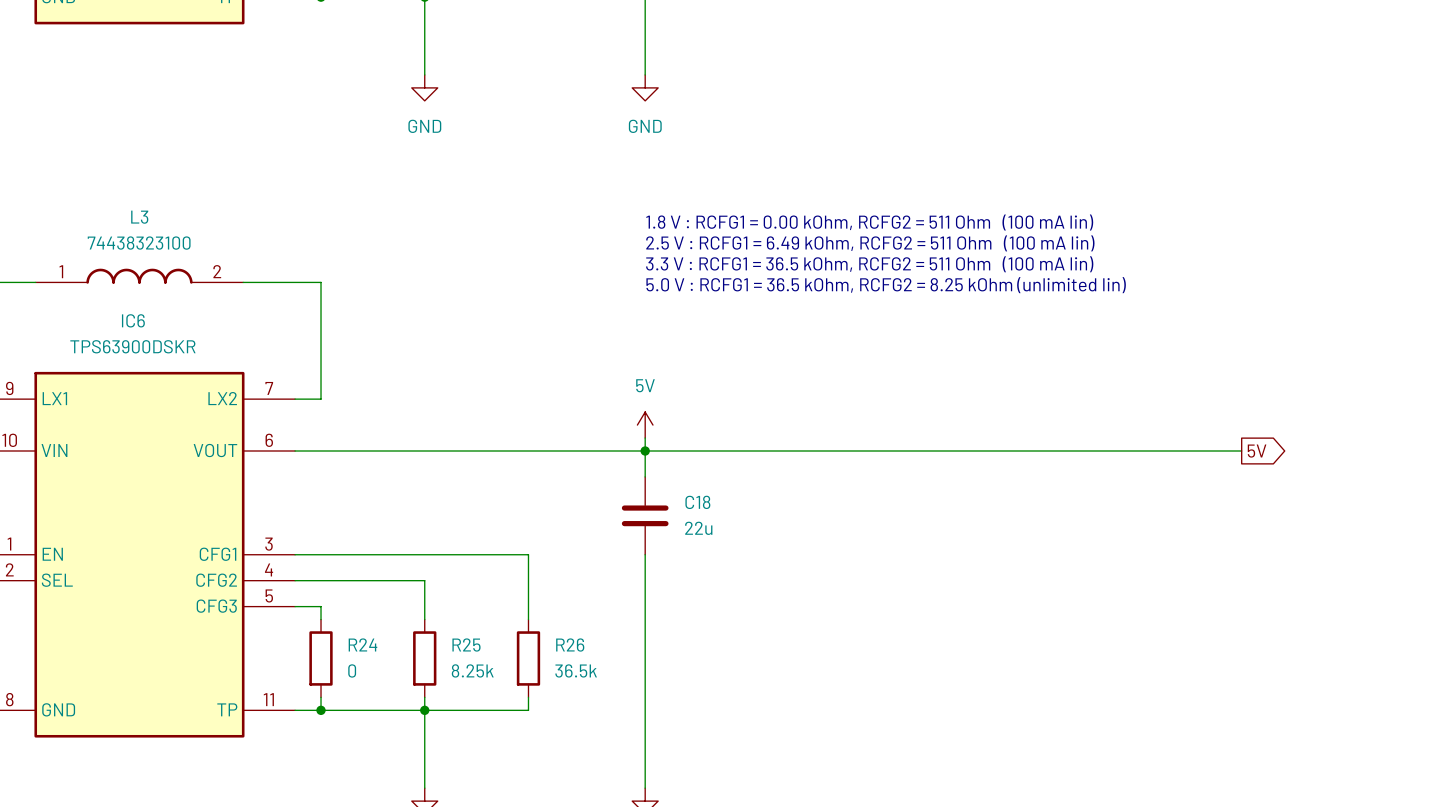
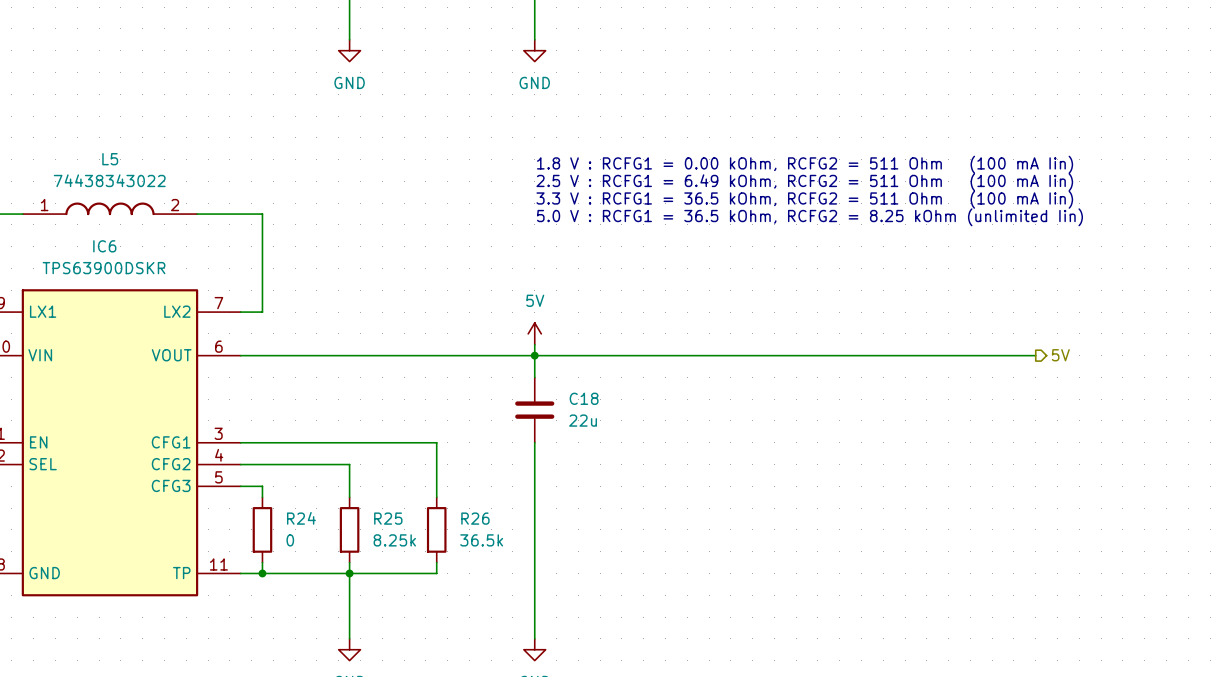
L3 name: L3 (139, 217) -> L5 (110, 159)
L3 value: 74438323100 (139, 243) -> 74438343022 (109, 180)
hierarchical label: none -> 5V (1060, 355)
global label: 5V (1257, 451) -> none

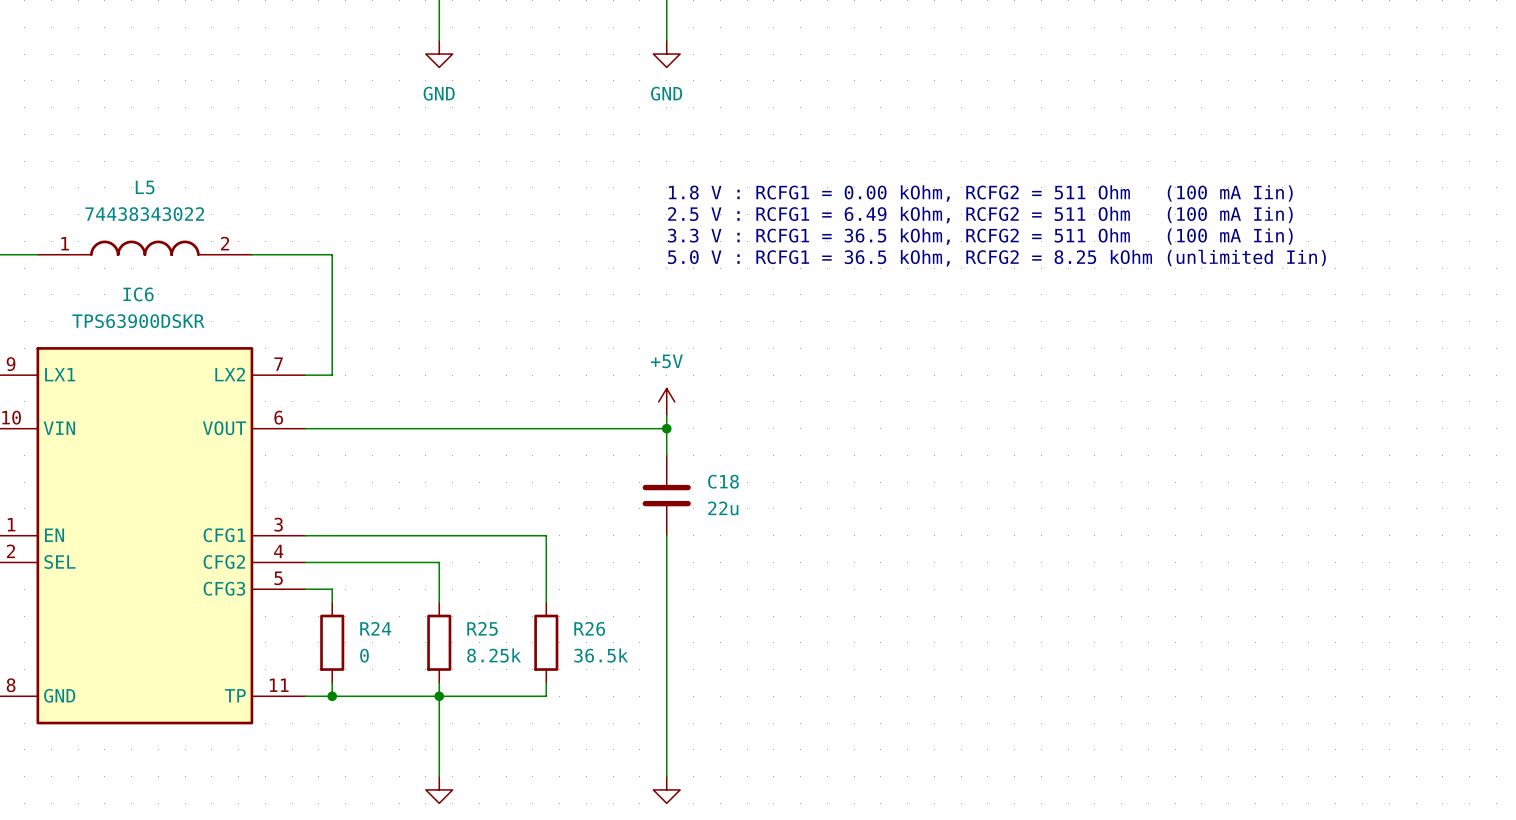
power symbol: 5V (534, 333) -> +5V (666, 401)
wire: (534, 355) (1035, 355) -> none
hierarchical label: 5V (1060, 355) -> none

